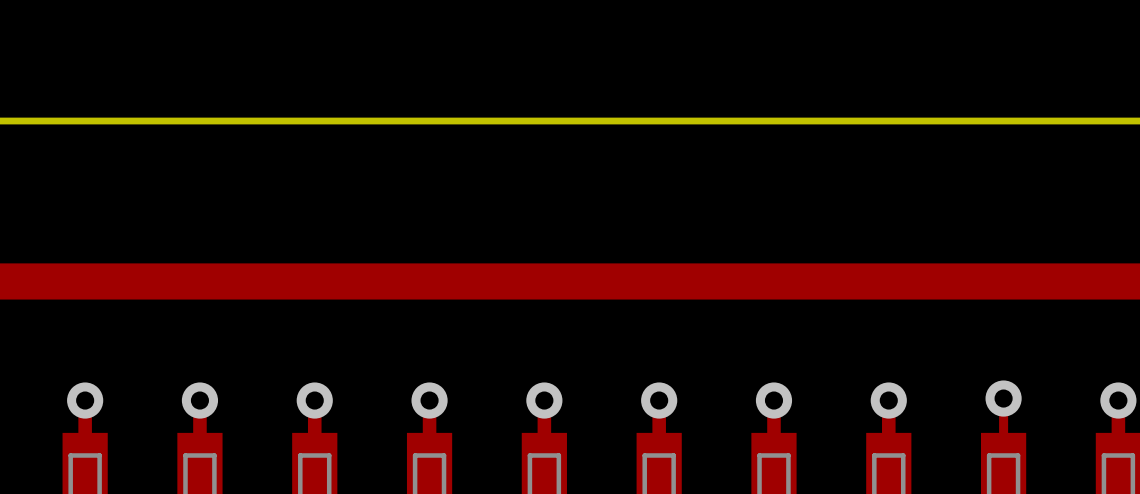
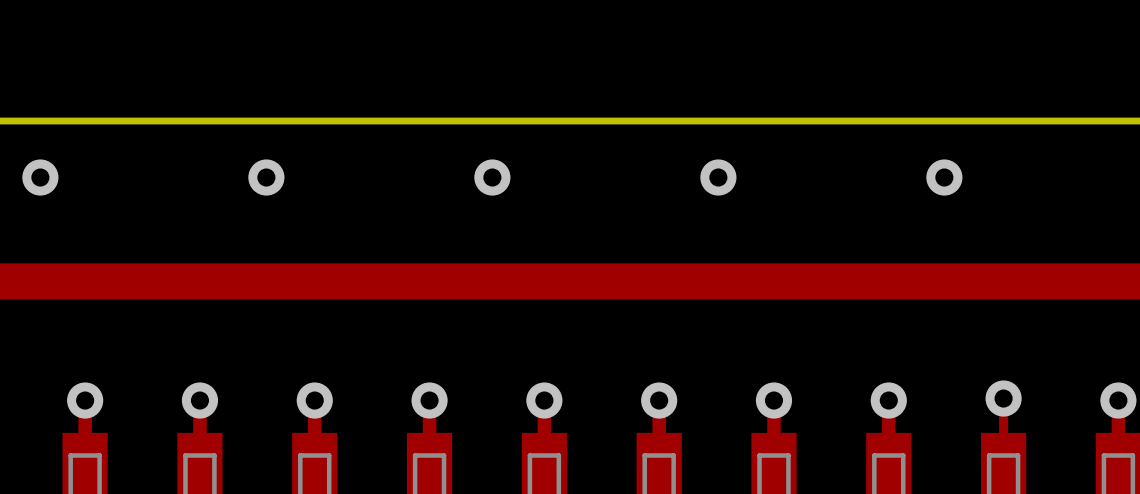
via: none -> (40, 177)
via: none -> (266, 177)
via: none -> (492, 177)
via: none -> (718, 177)
via: none -> (944, 177)

